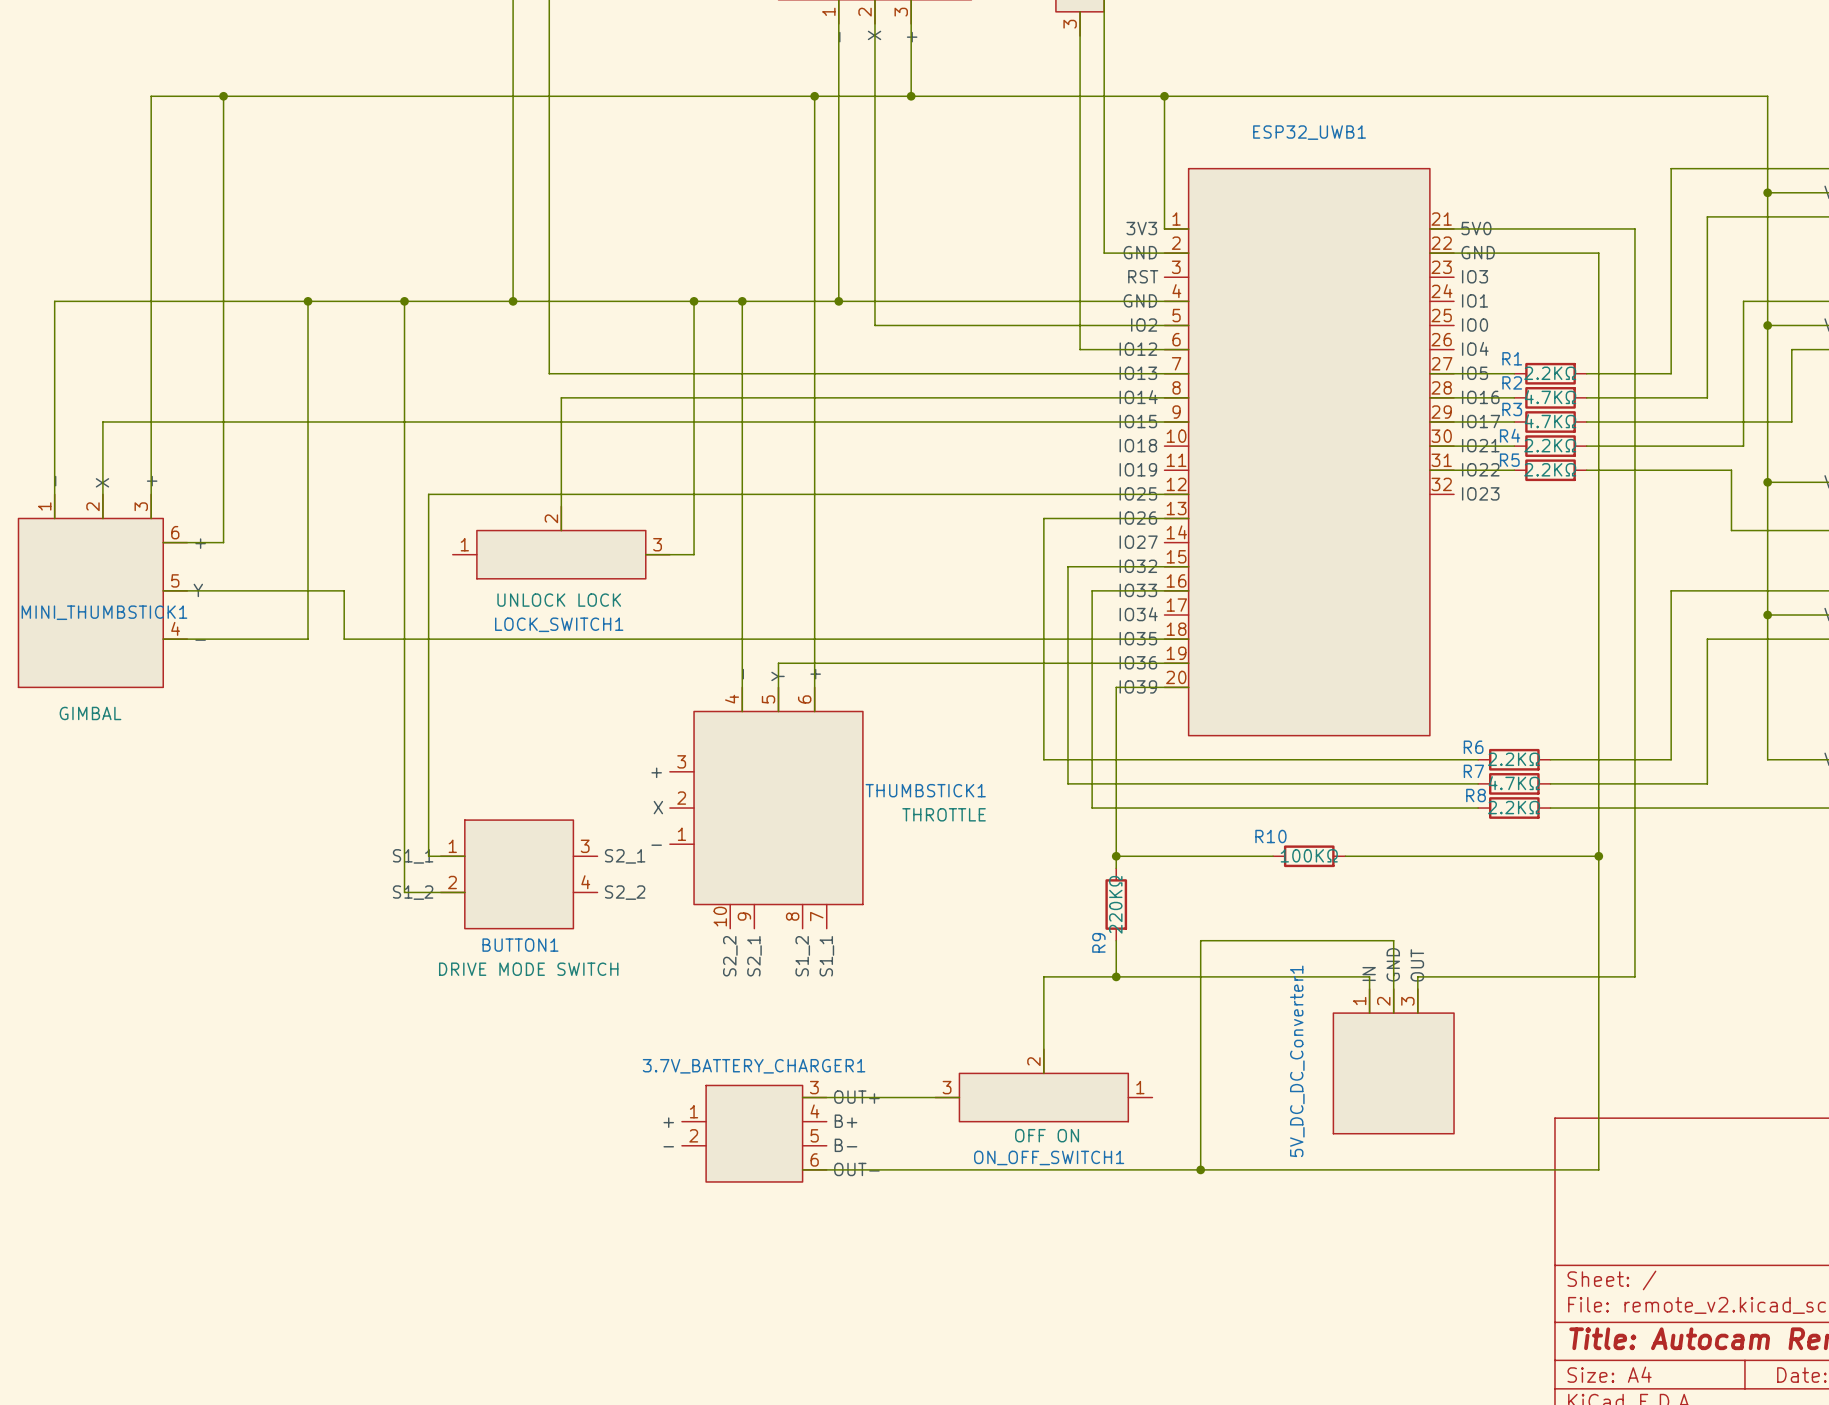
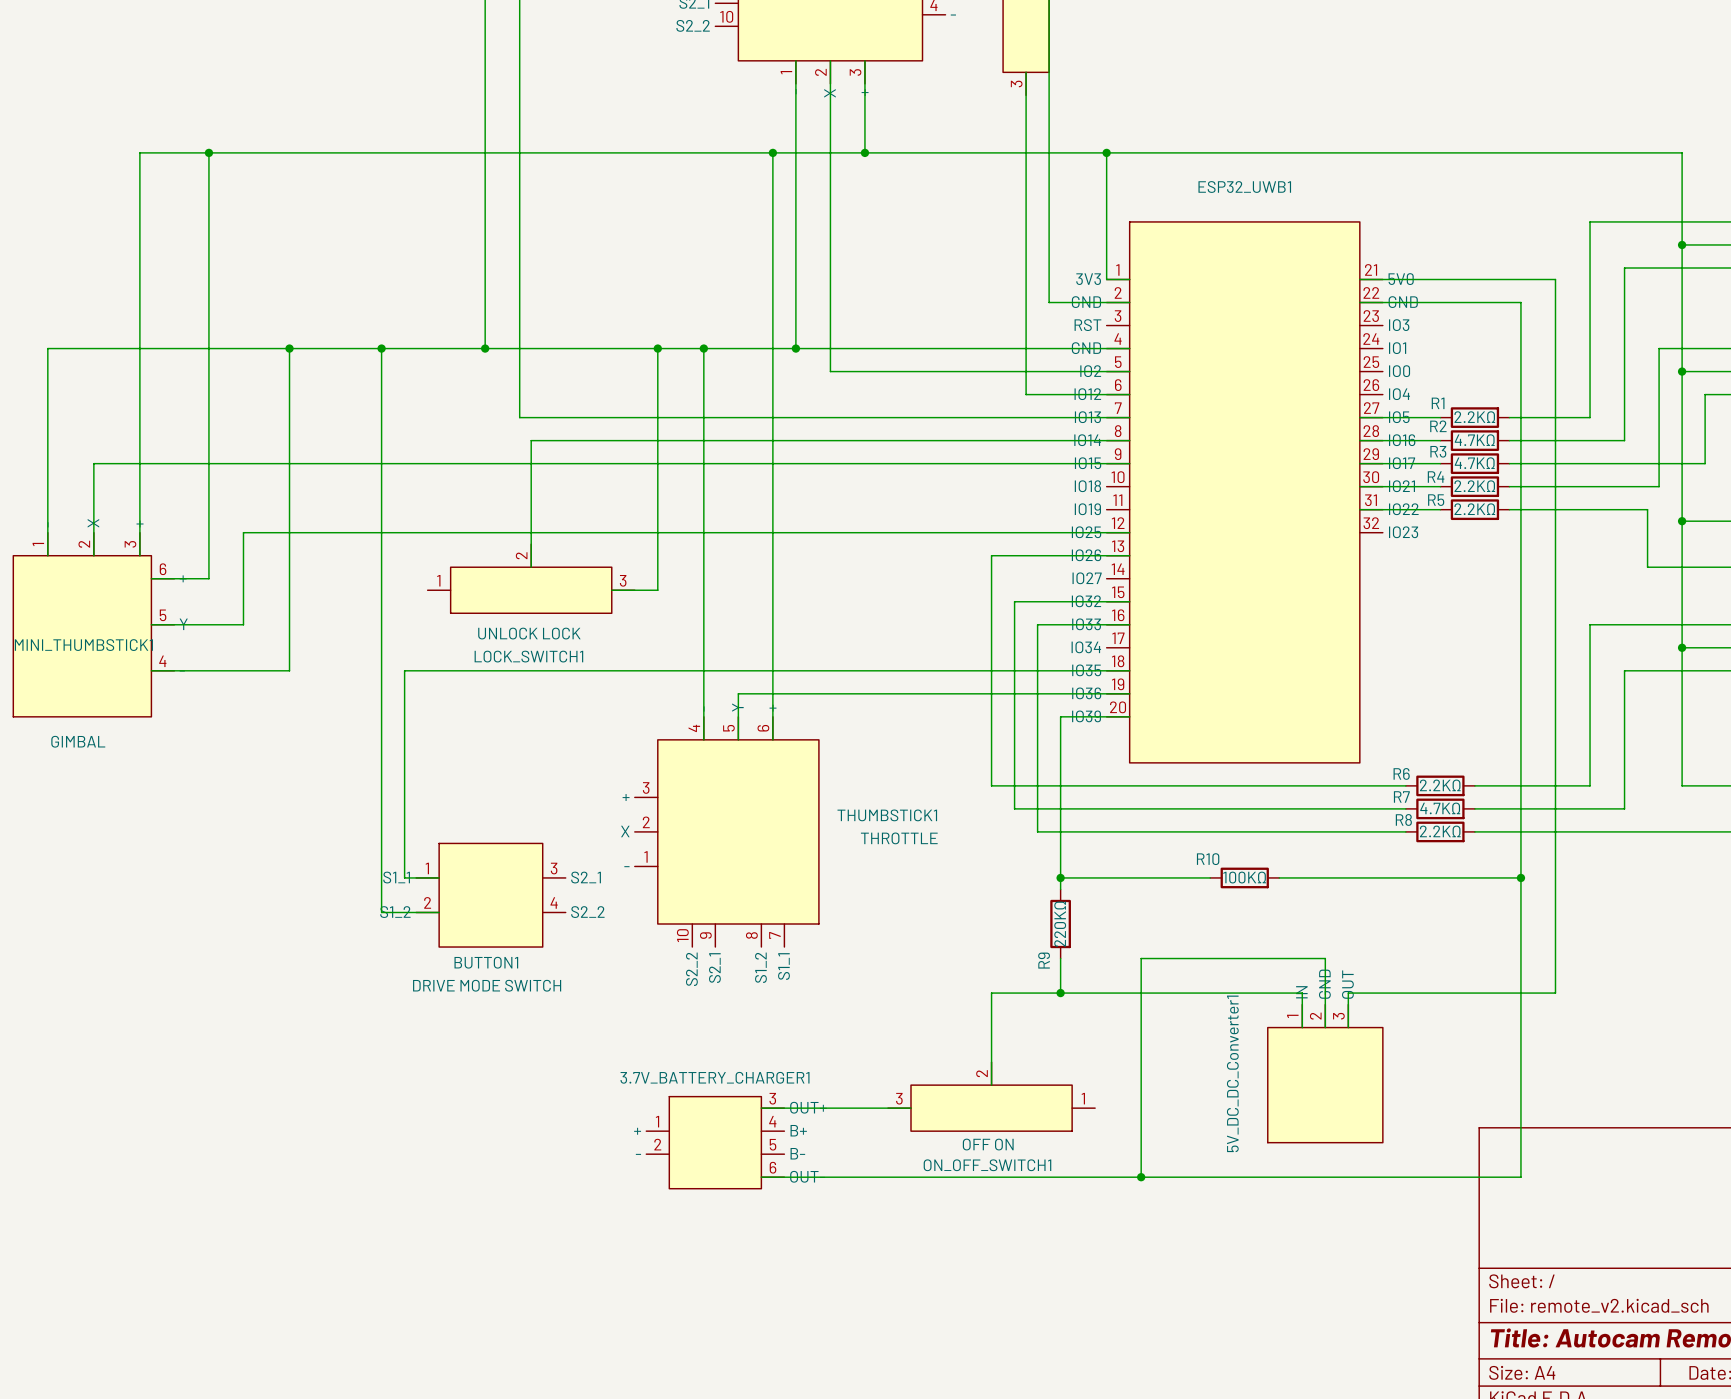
wire: (428, 494) (428, 639) (344, 639) (344, 590) (259, 590) -> (404, 532) (243, 532) (243, 624)

